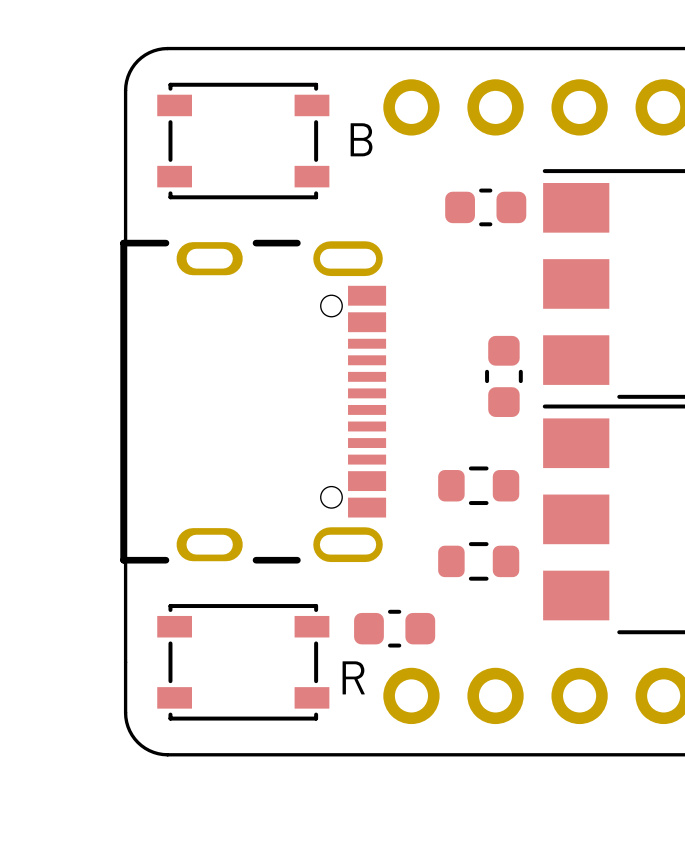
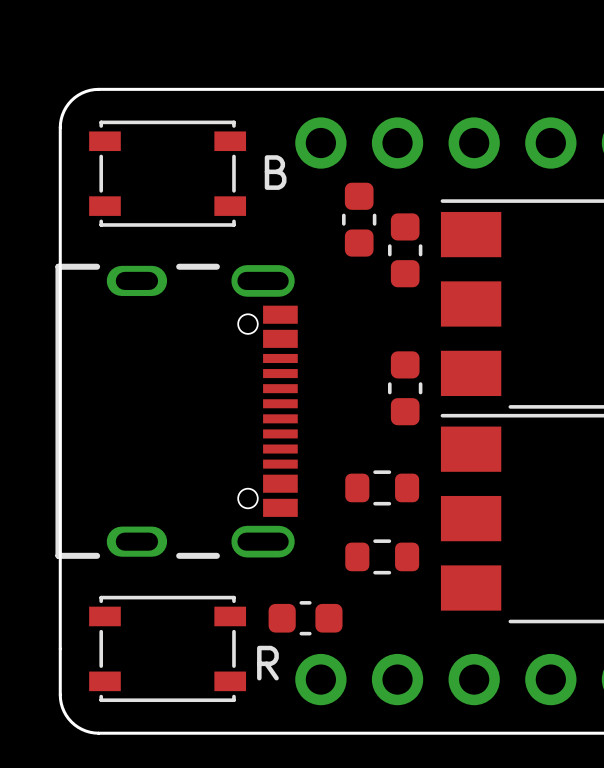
part: none -> (359, 219)
part: (485, 207) -> none
part: none -> (405, 250)

